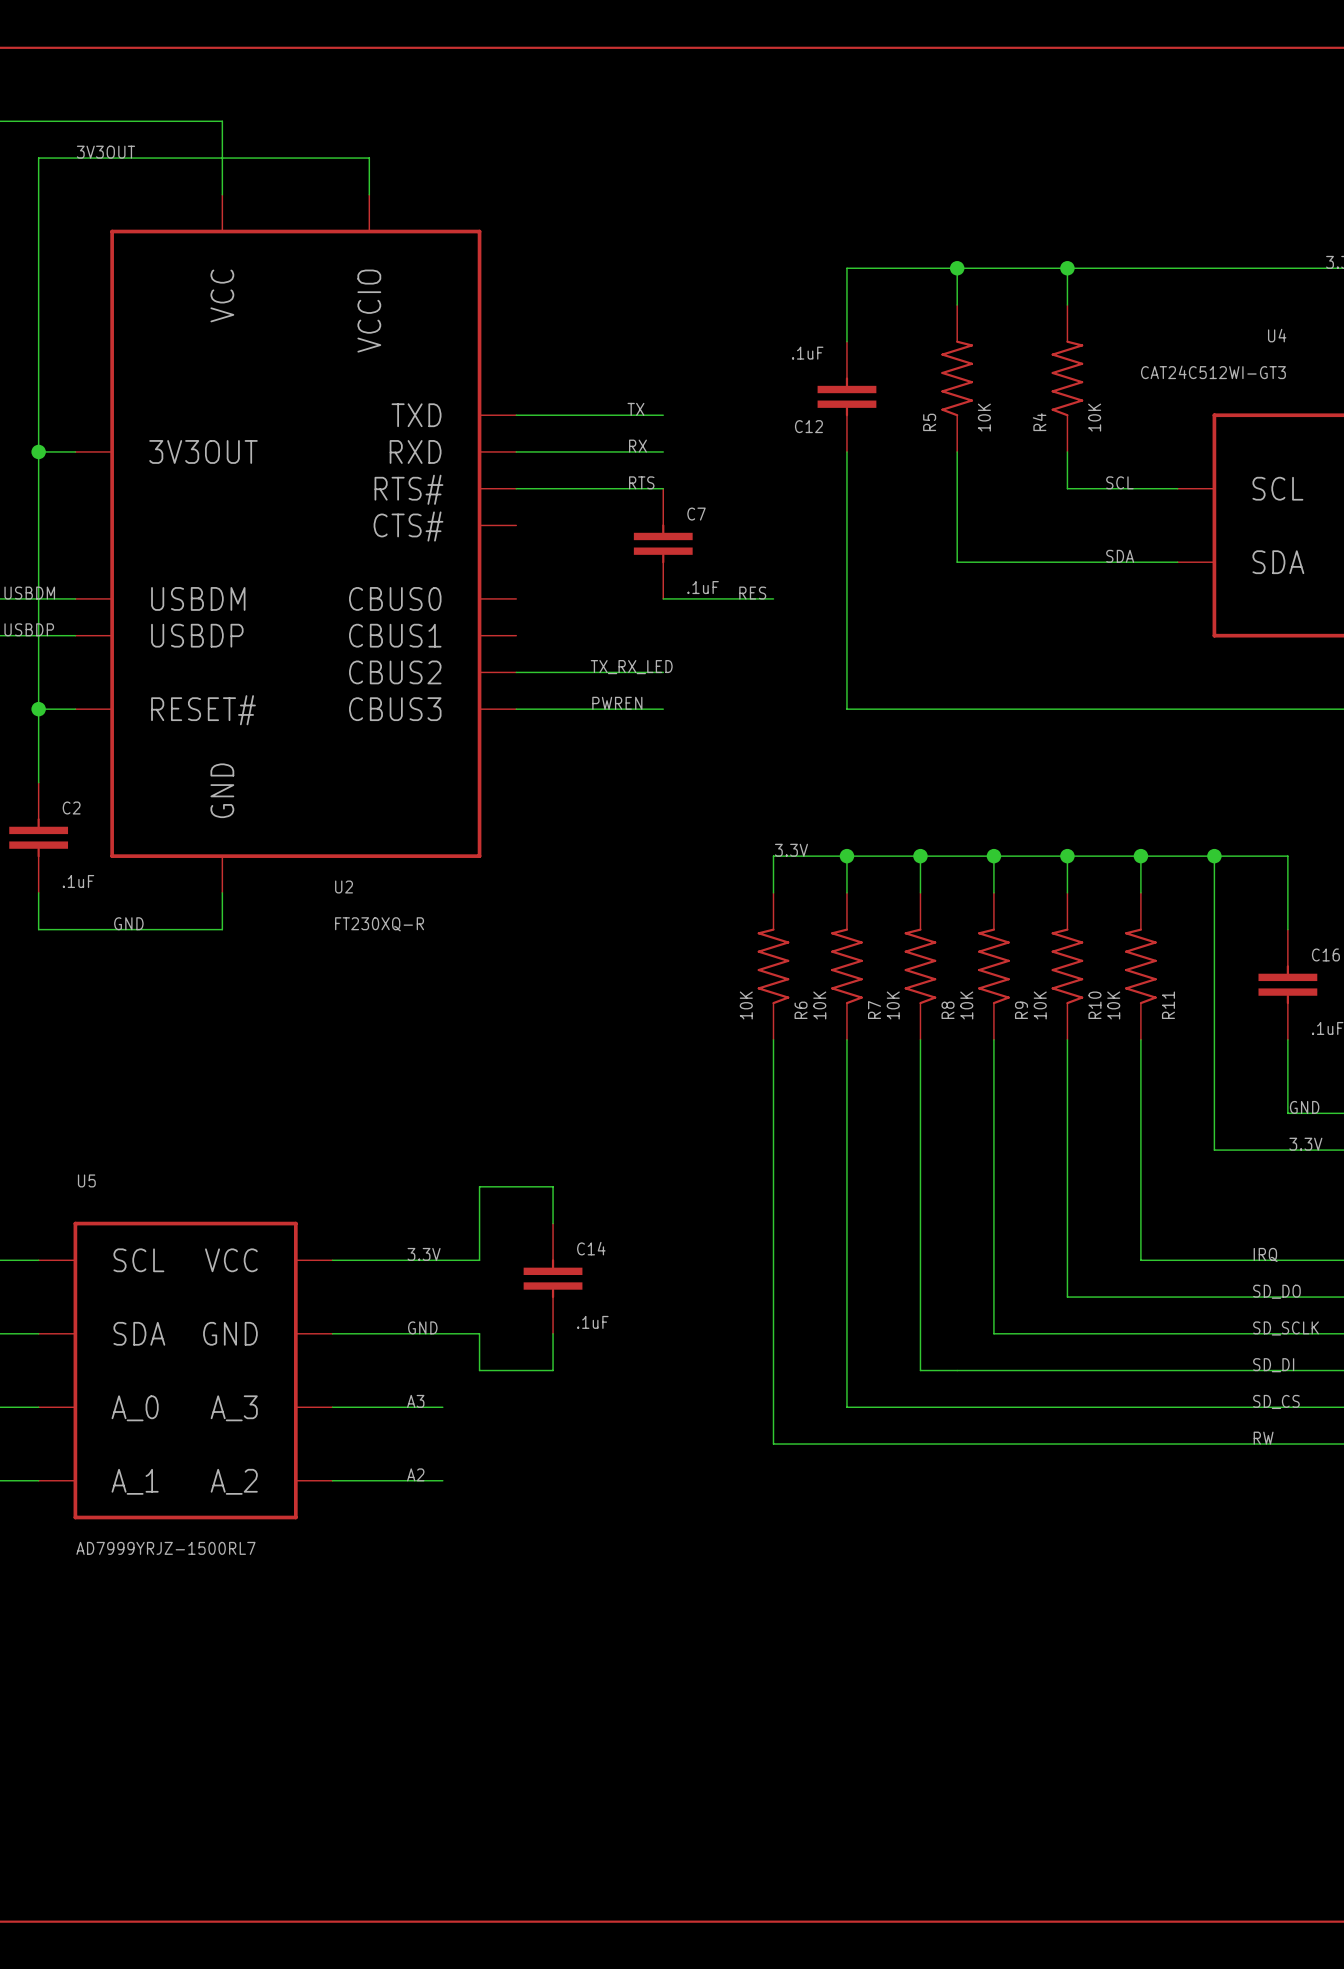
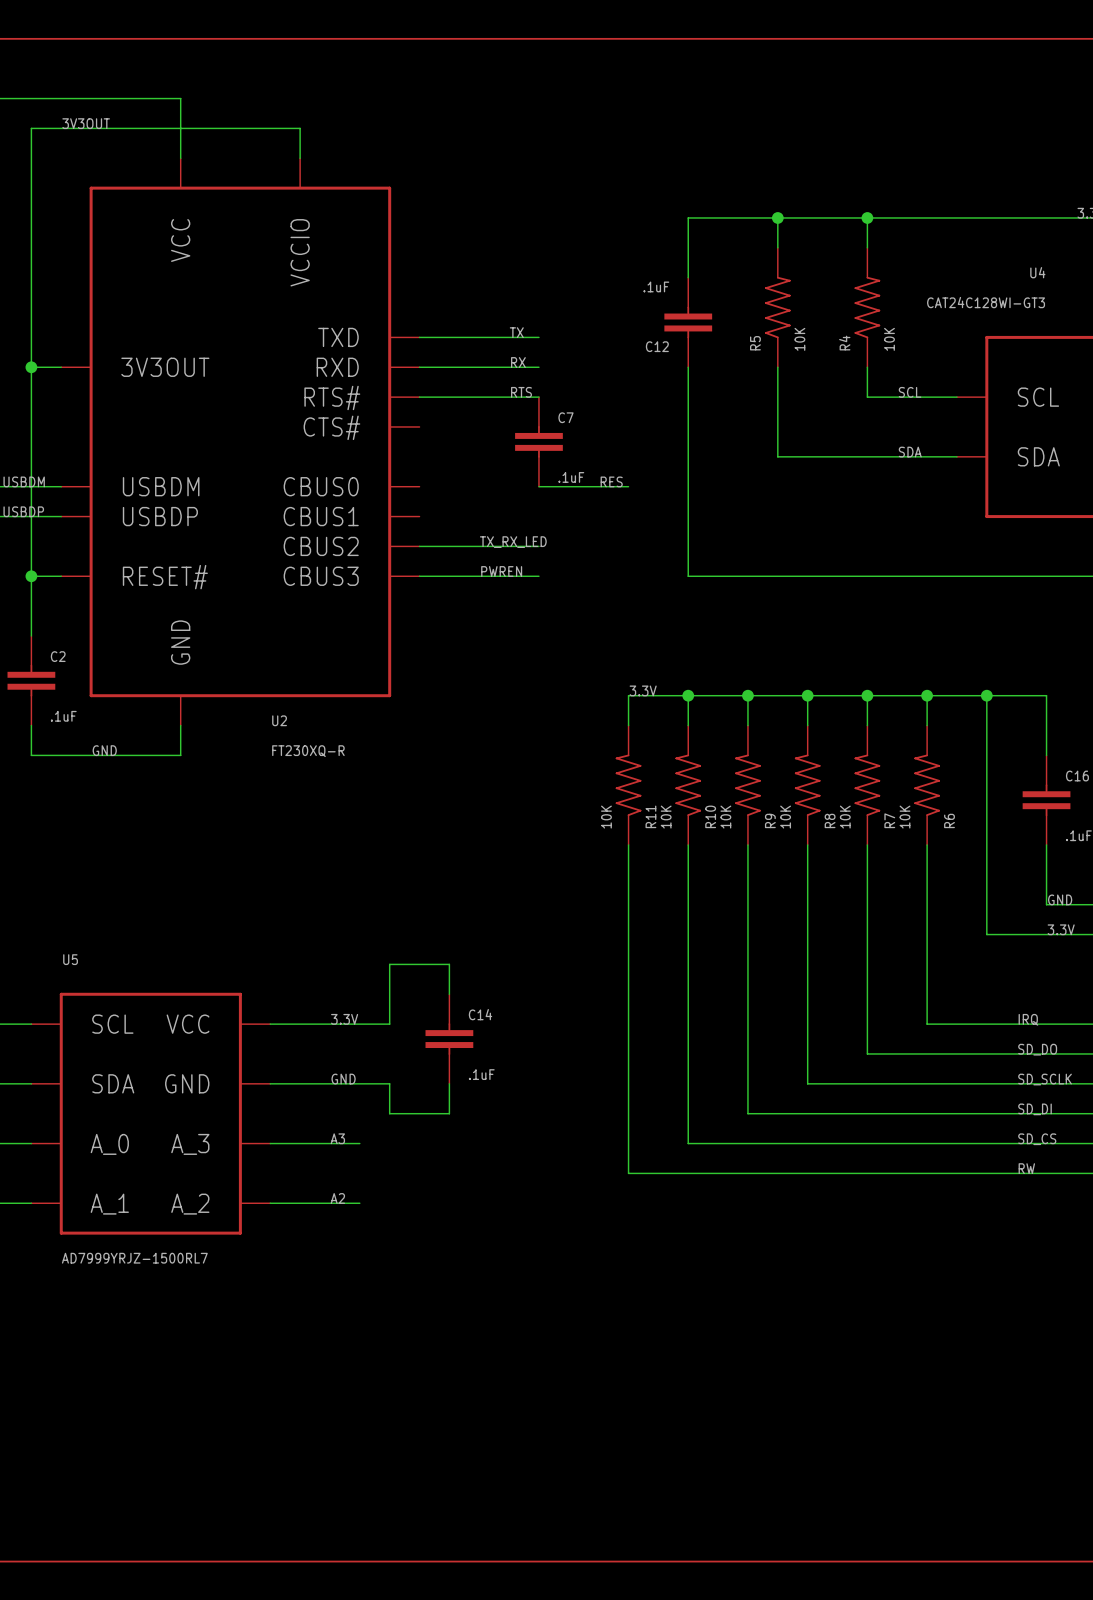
U4 value: CAT24C512WI-GT3 (1213, 372) -> CAT24C128WI-GT3 (986, 302)
R10 name: R10 (1094, 1005) -> R7 (889, 820)
R11 name: R11 (1168, 1005) -> R6 (949, 820)
R6 name: R6 (801, 1010) -> R11 (650, 816)
R7 name: R7 (874, 1010) -> R10 (710, 816)
R8 name: R8 (948, 1010) -> R9 (770, 820)
R9 name: R9 (1021, 1010) -> R8 (830, 820)

